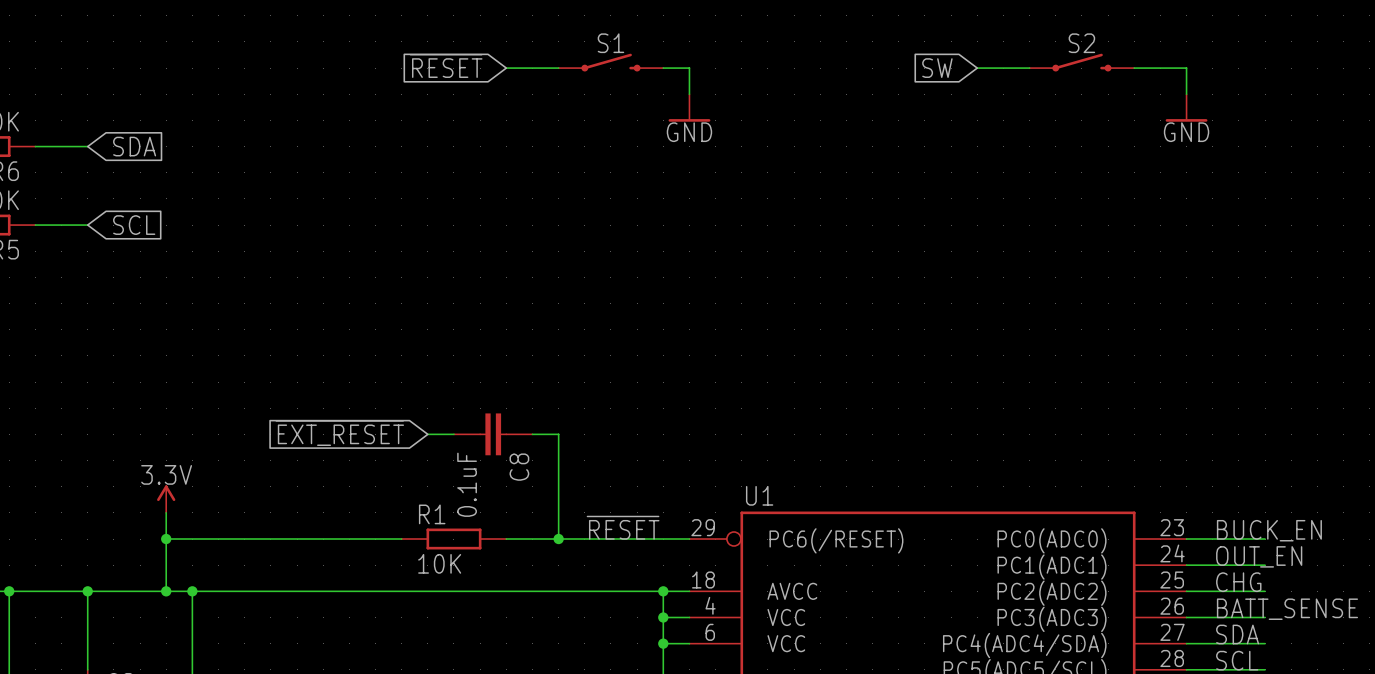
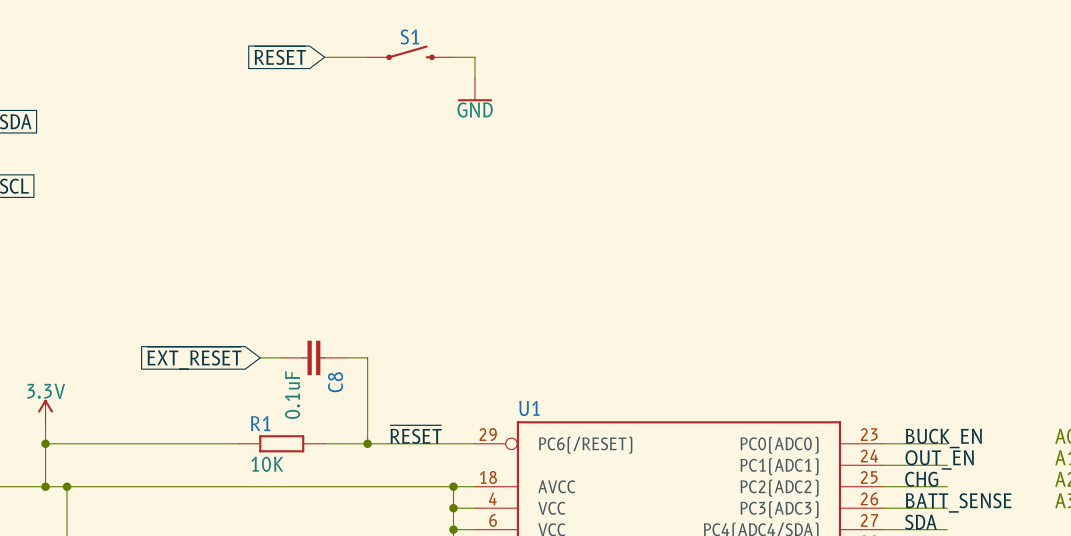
S2: (1081, 62) -> none
global label: SW (937, 68) -> none
wire: (977, 68) (1029, 68) -> none
wire: (1134, 68) (1186, 68) (1186, 94) -> none
power symbol: GND (1186, 107) -> none

